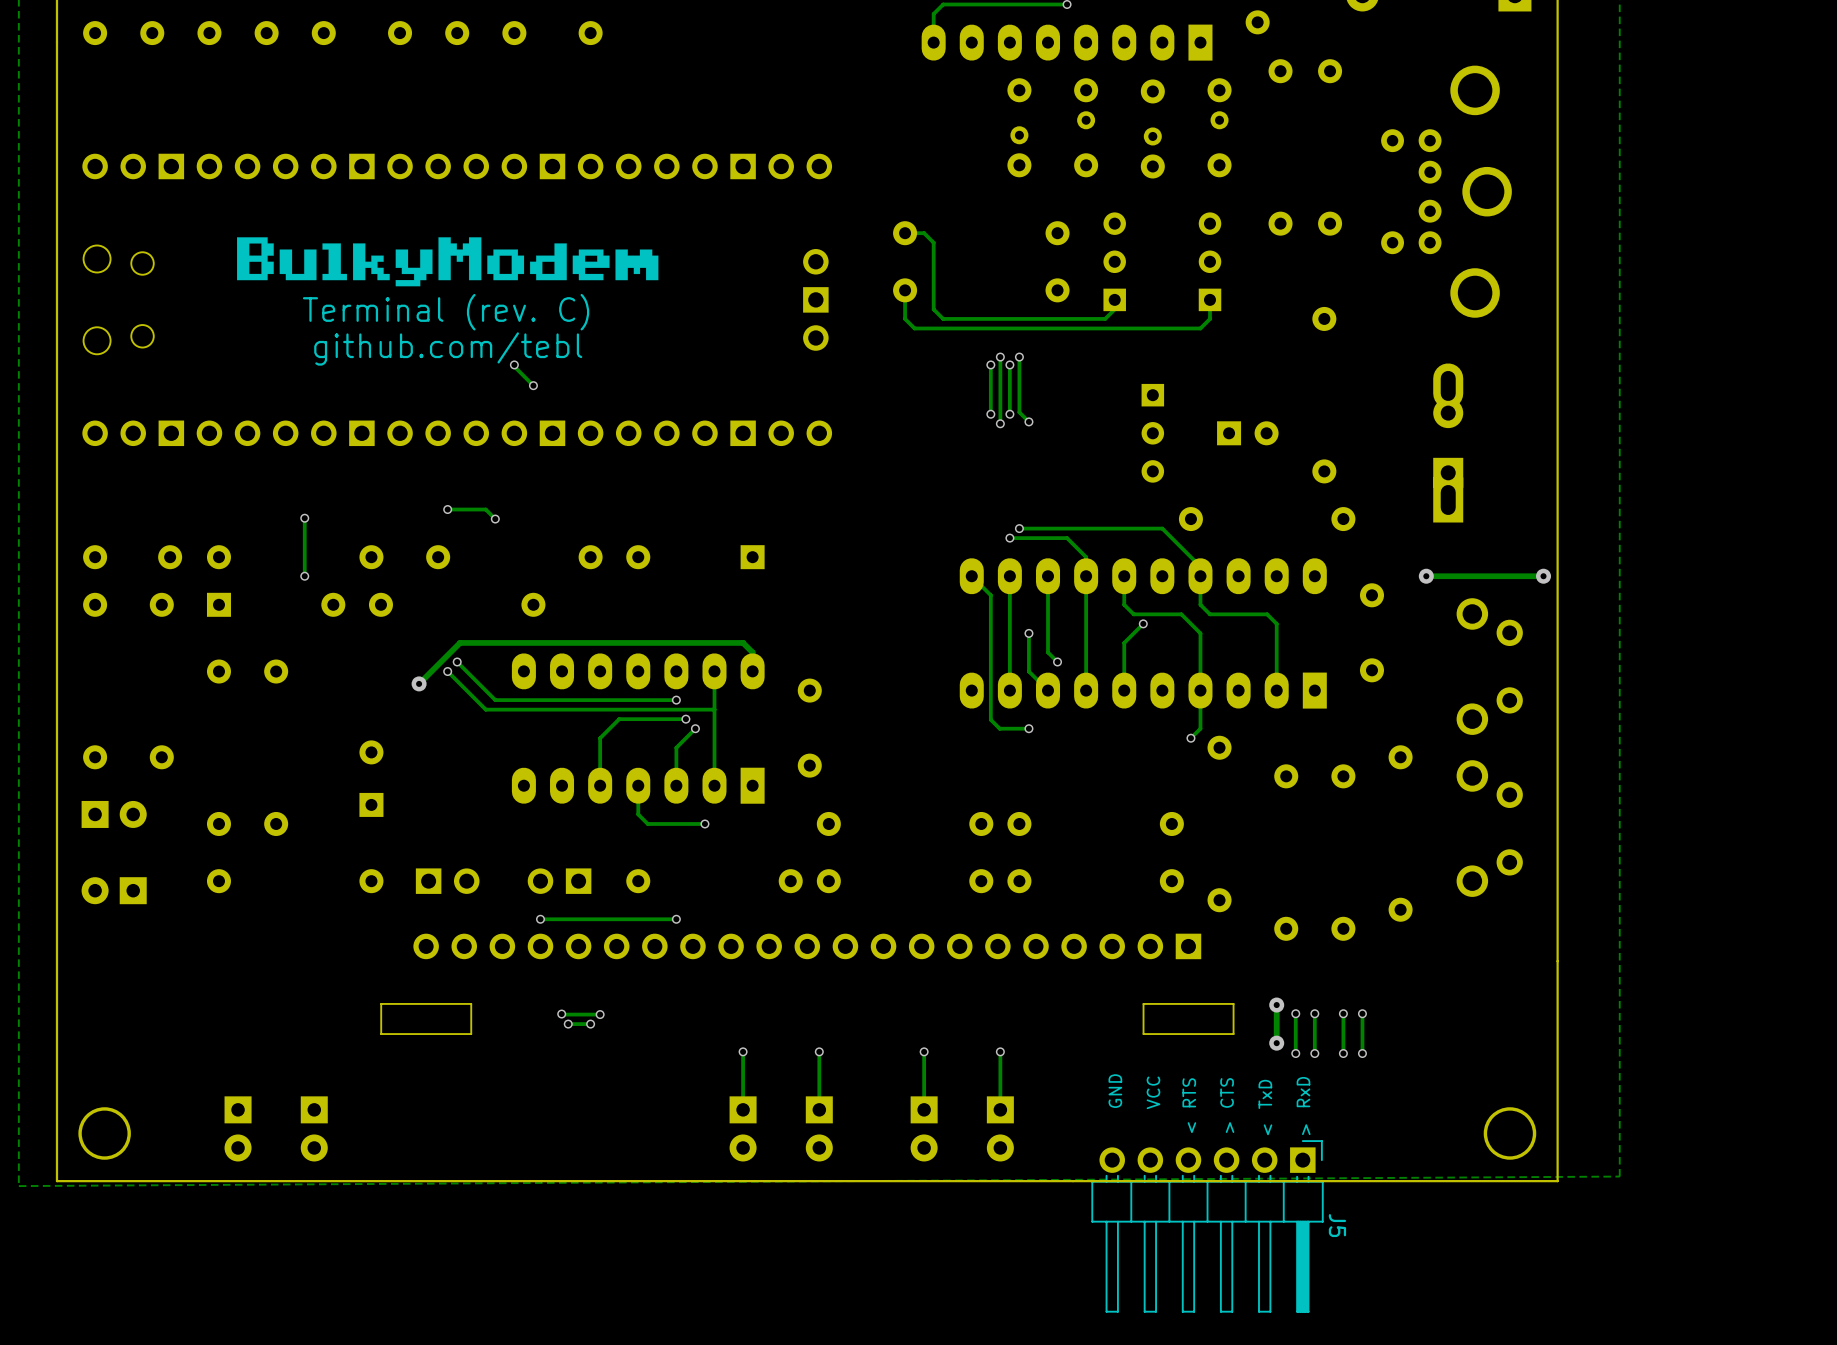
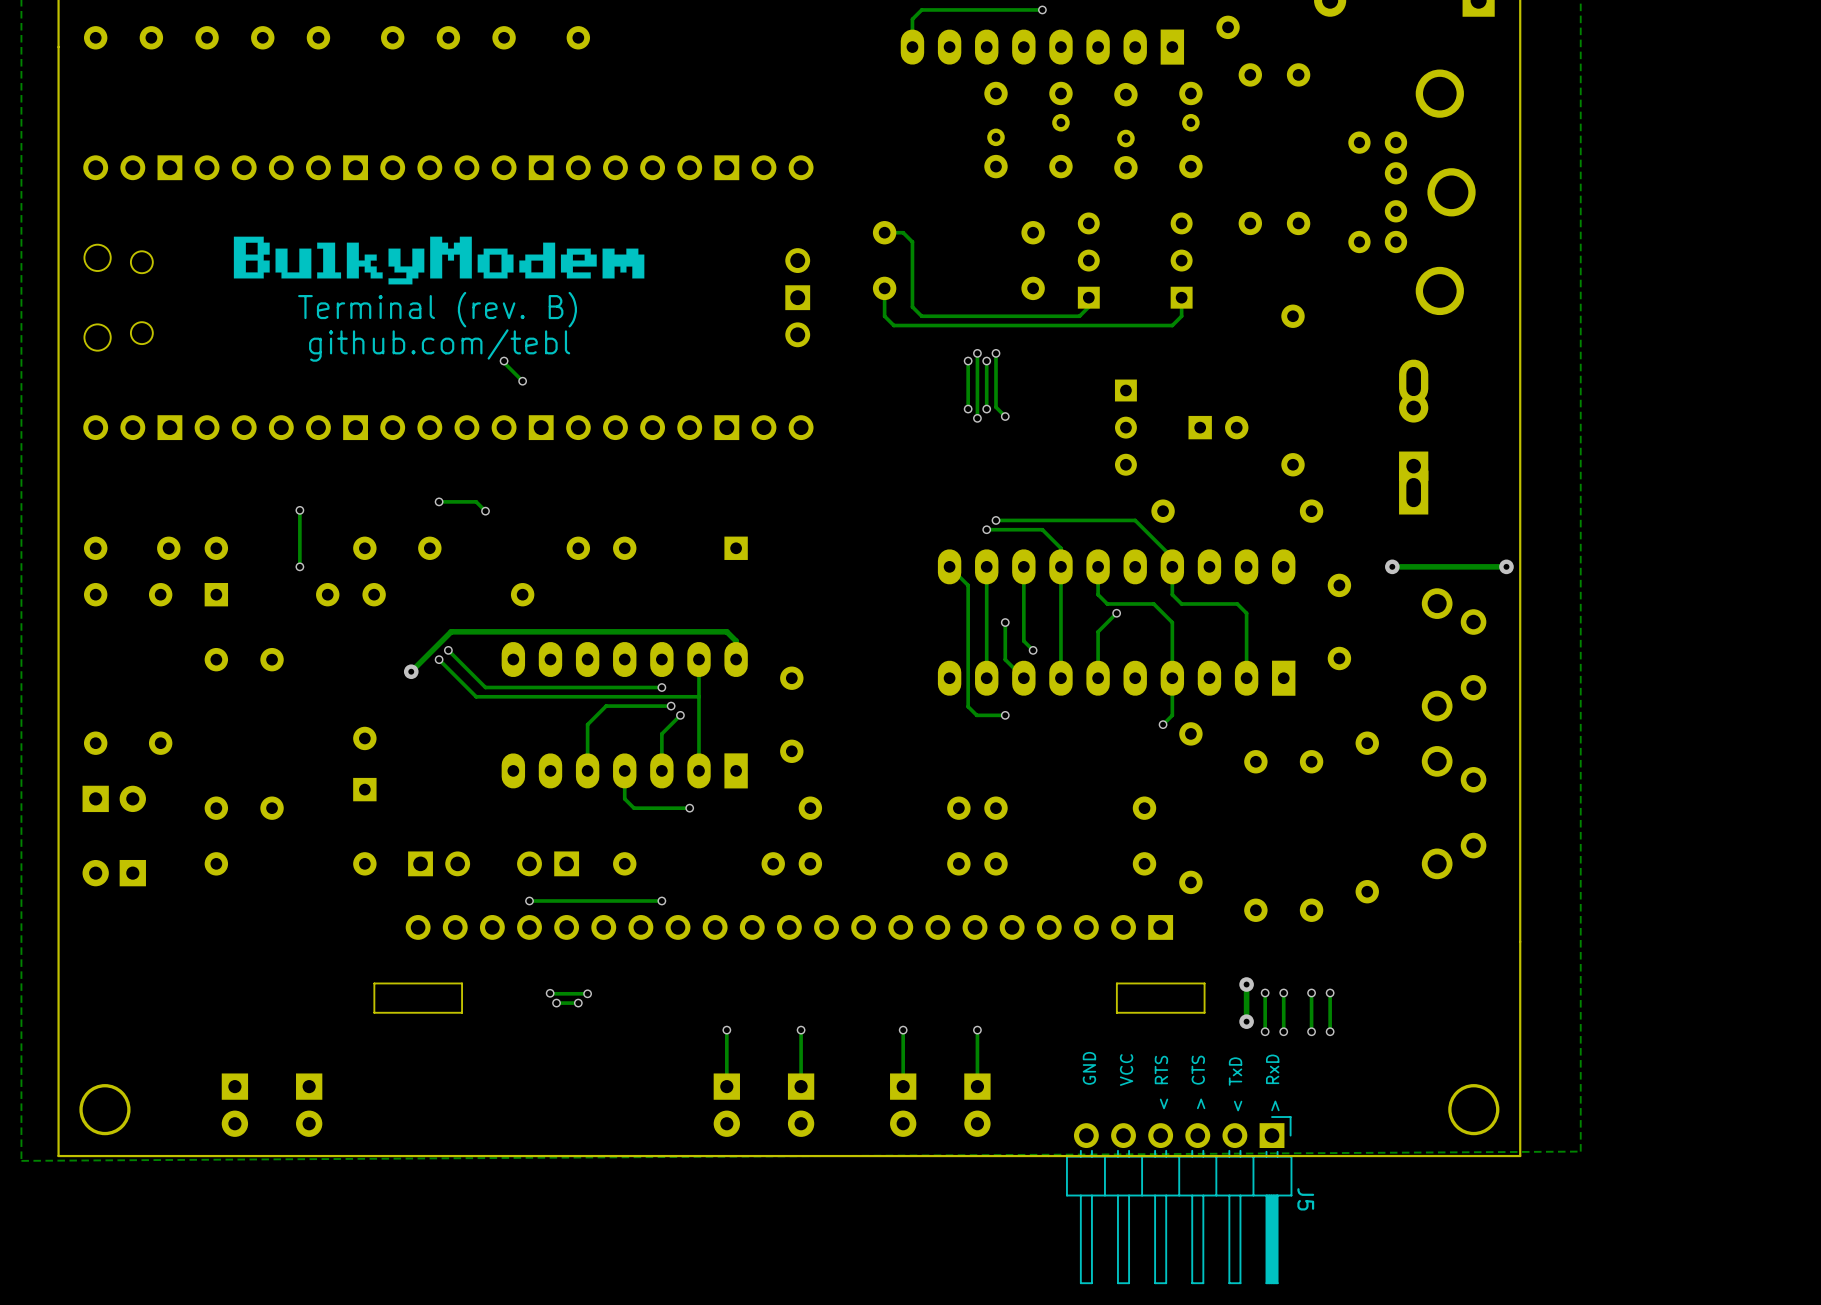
text: Terminal (rev. C) (446, 312) -> Terminal (rev. B) (437, 309)

